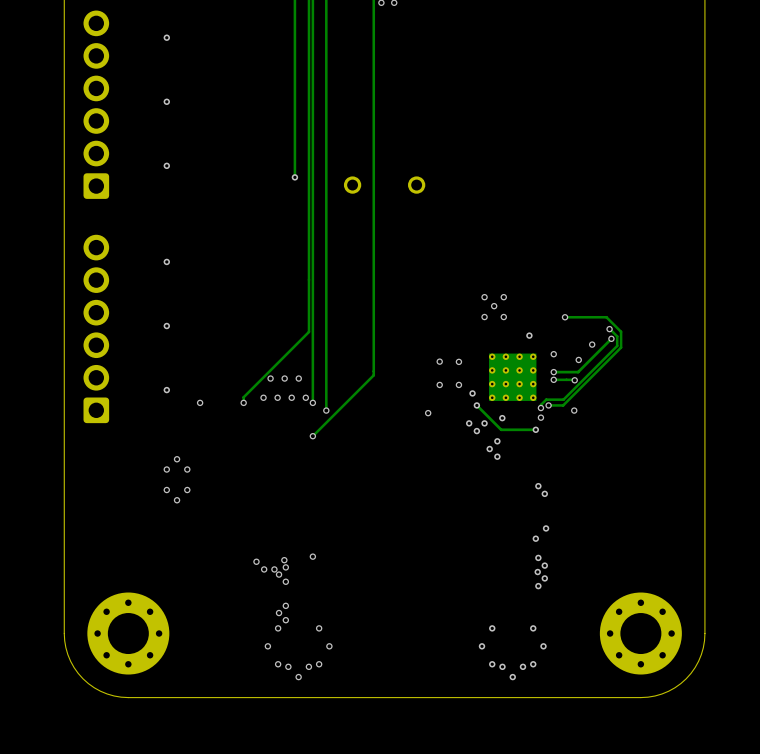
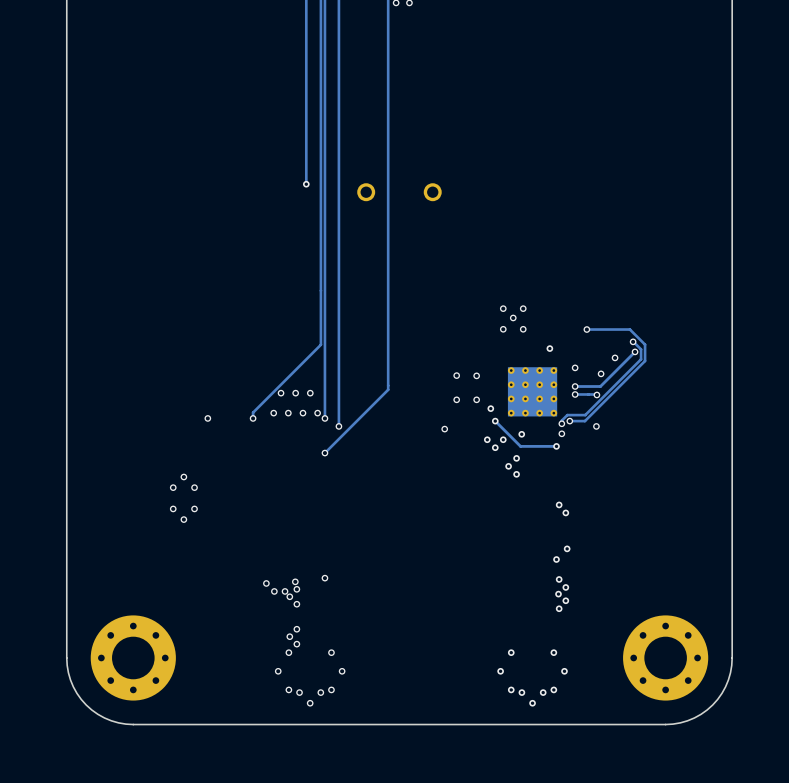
via: (166, 37) -> none
via: (166, 101) -> none
part: (96, 104) -> none
via: (166, 165) -> none
via: (166, 261) -> none
via: (166, 326) -> none
part: (96, 328) -> none
via: (166, 390) -> none

